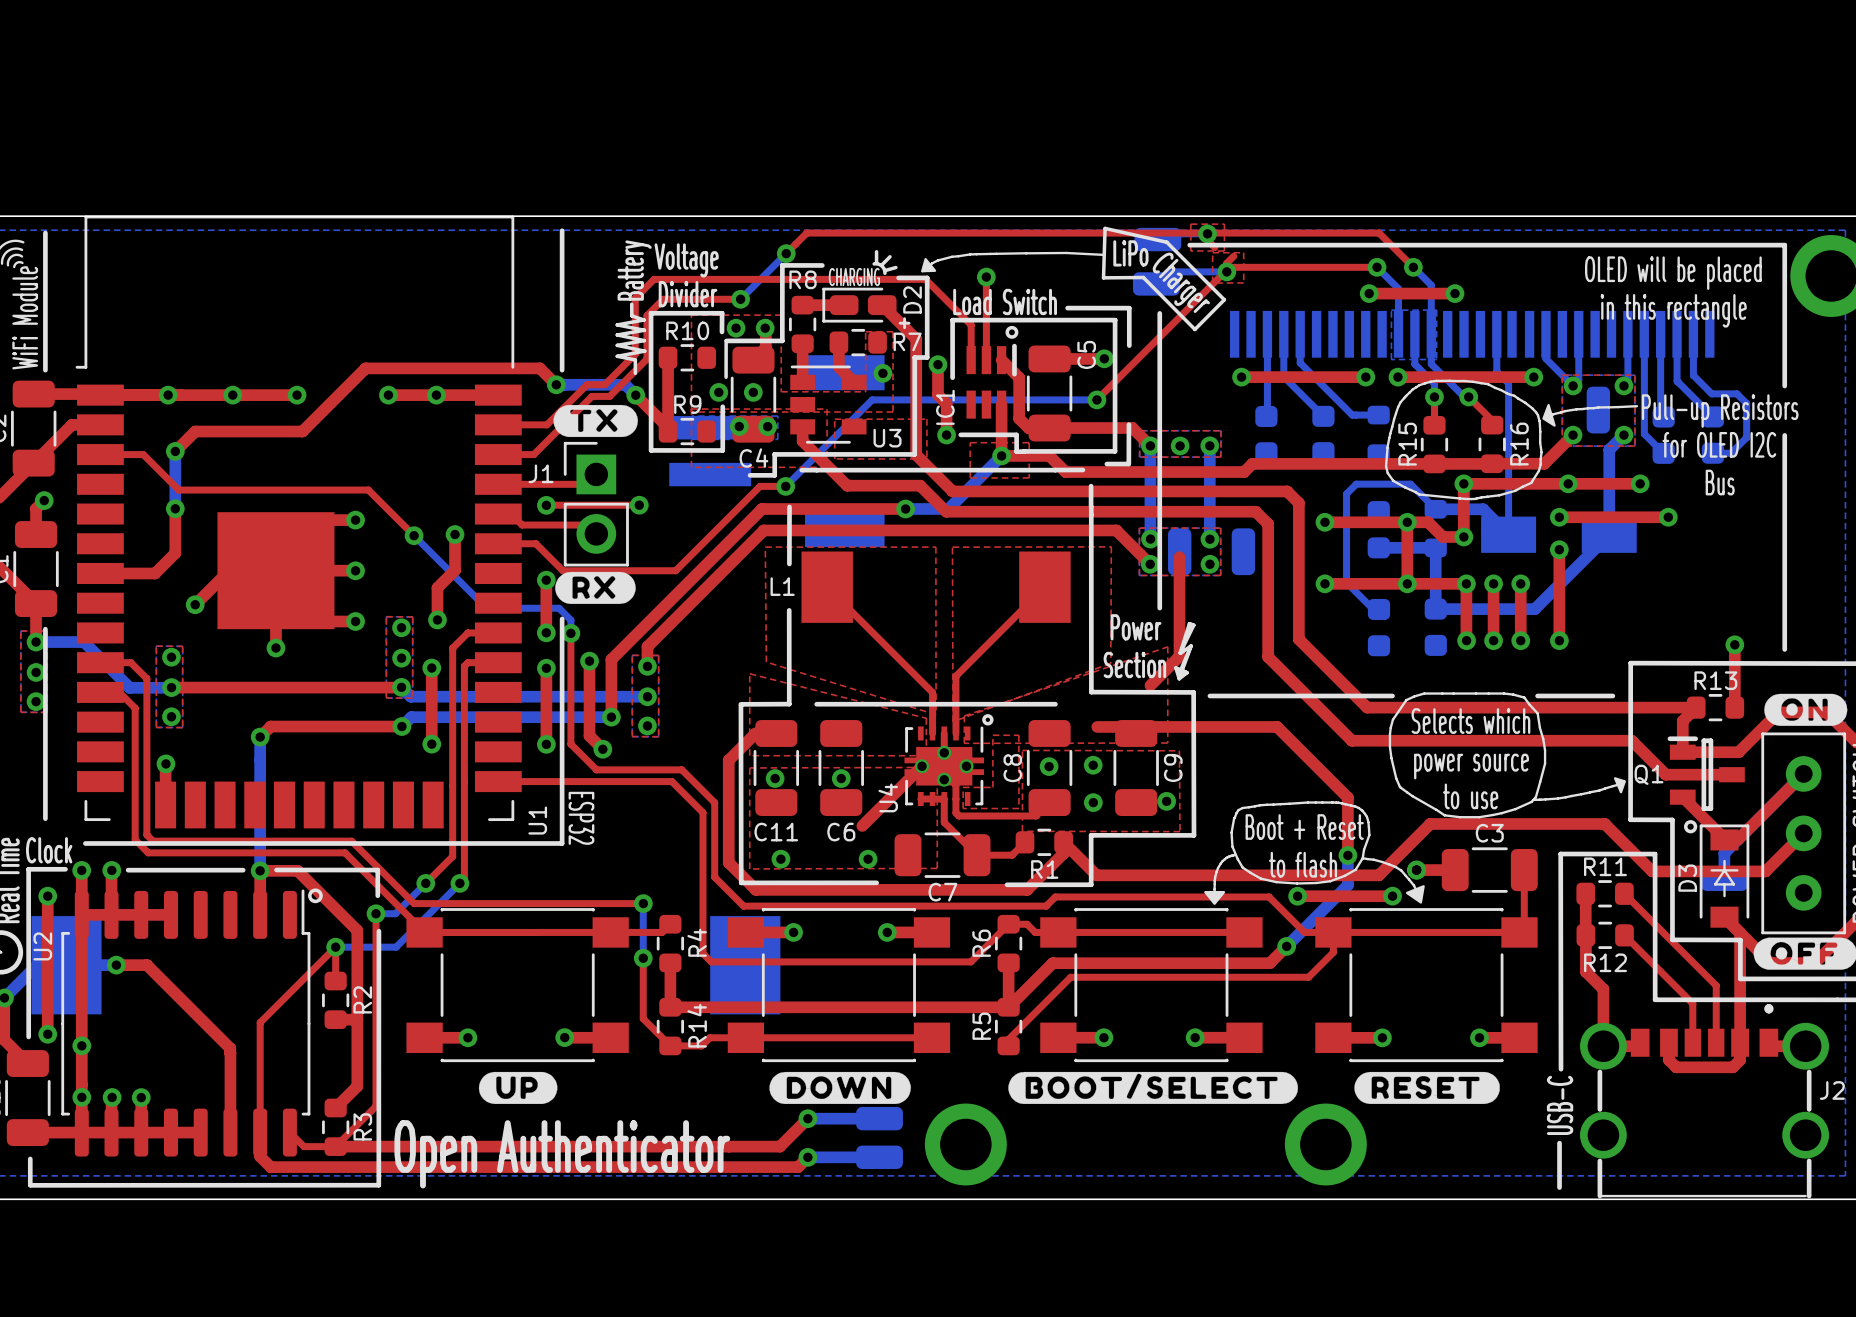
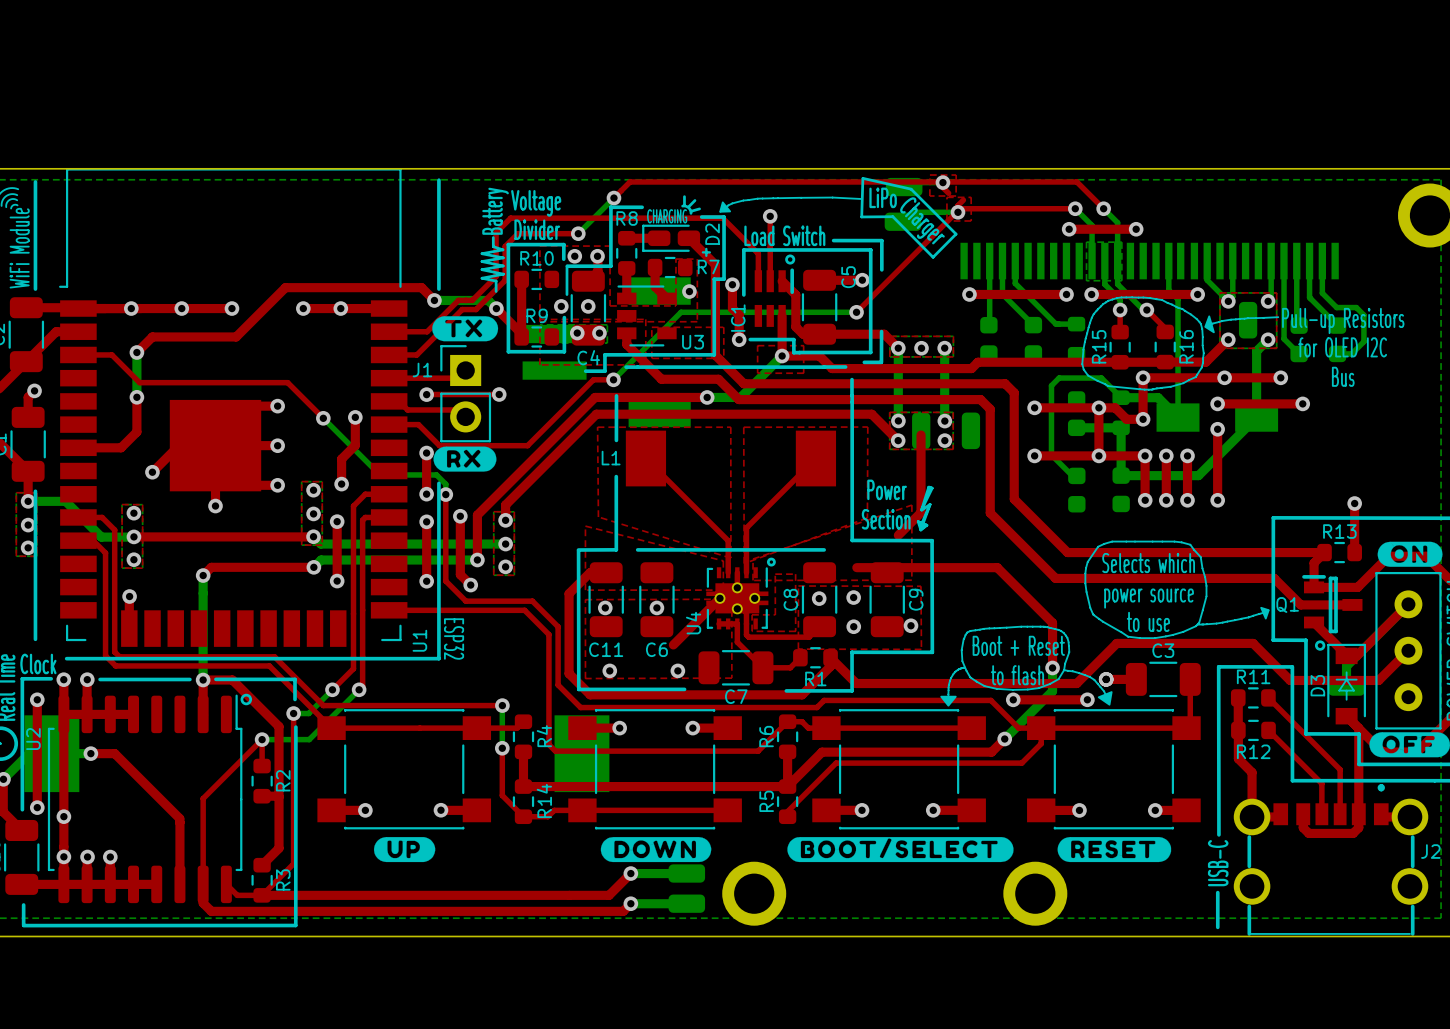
line: (1189, 245) (1784, 245) (1784, 386) -> none
text: OLED will be placed (1673, 273) -> none
text: in this rectangle (1673, 310) -> none
line: (1159, 313) (1159, 608) -> none
line: (1784, 435) (1784, 649) -> none
line: (1209, 695) (1392, 695) -> none
line: (1537, 695) (1612, 695) -> none
text: Open Authenticator (562, 1154) -> none

